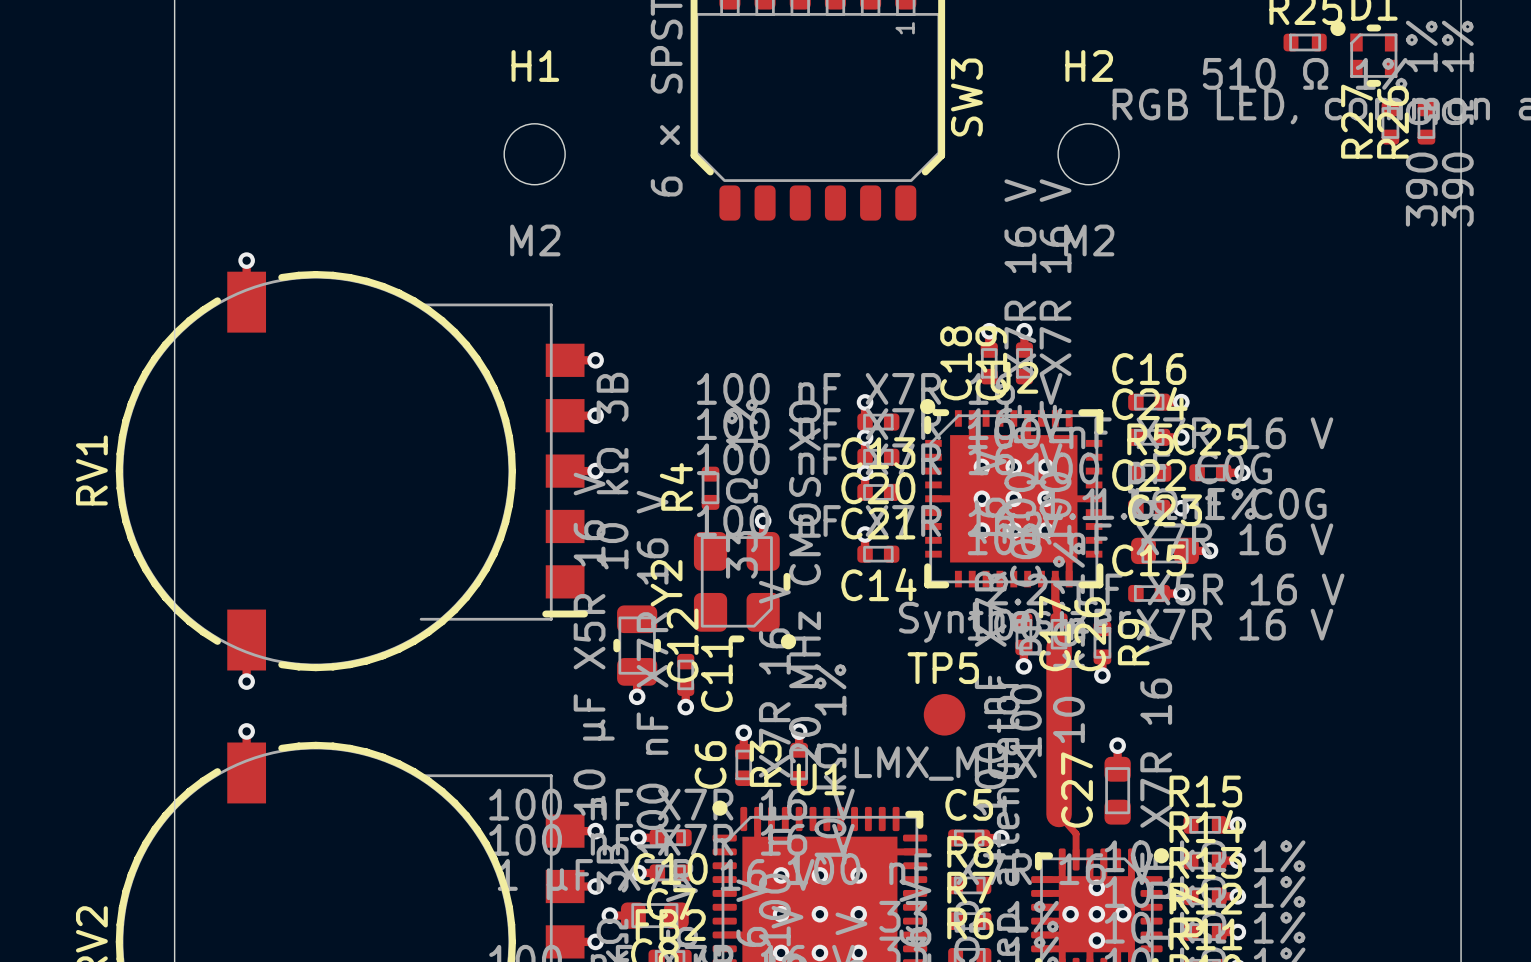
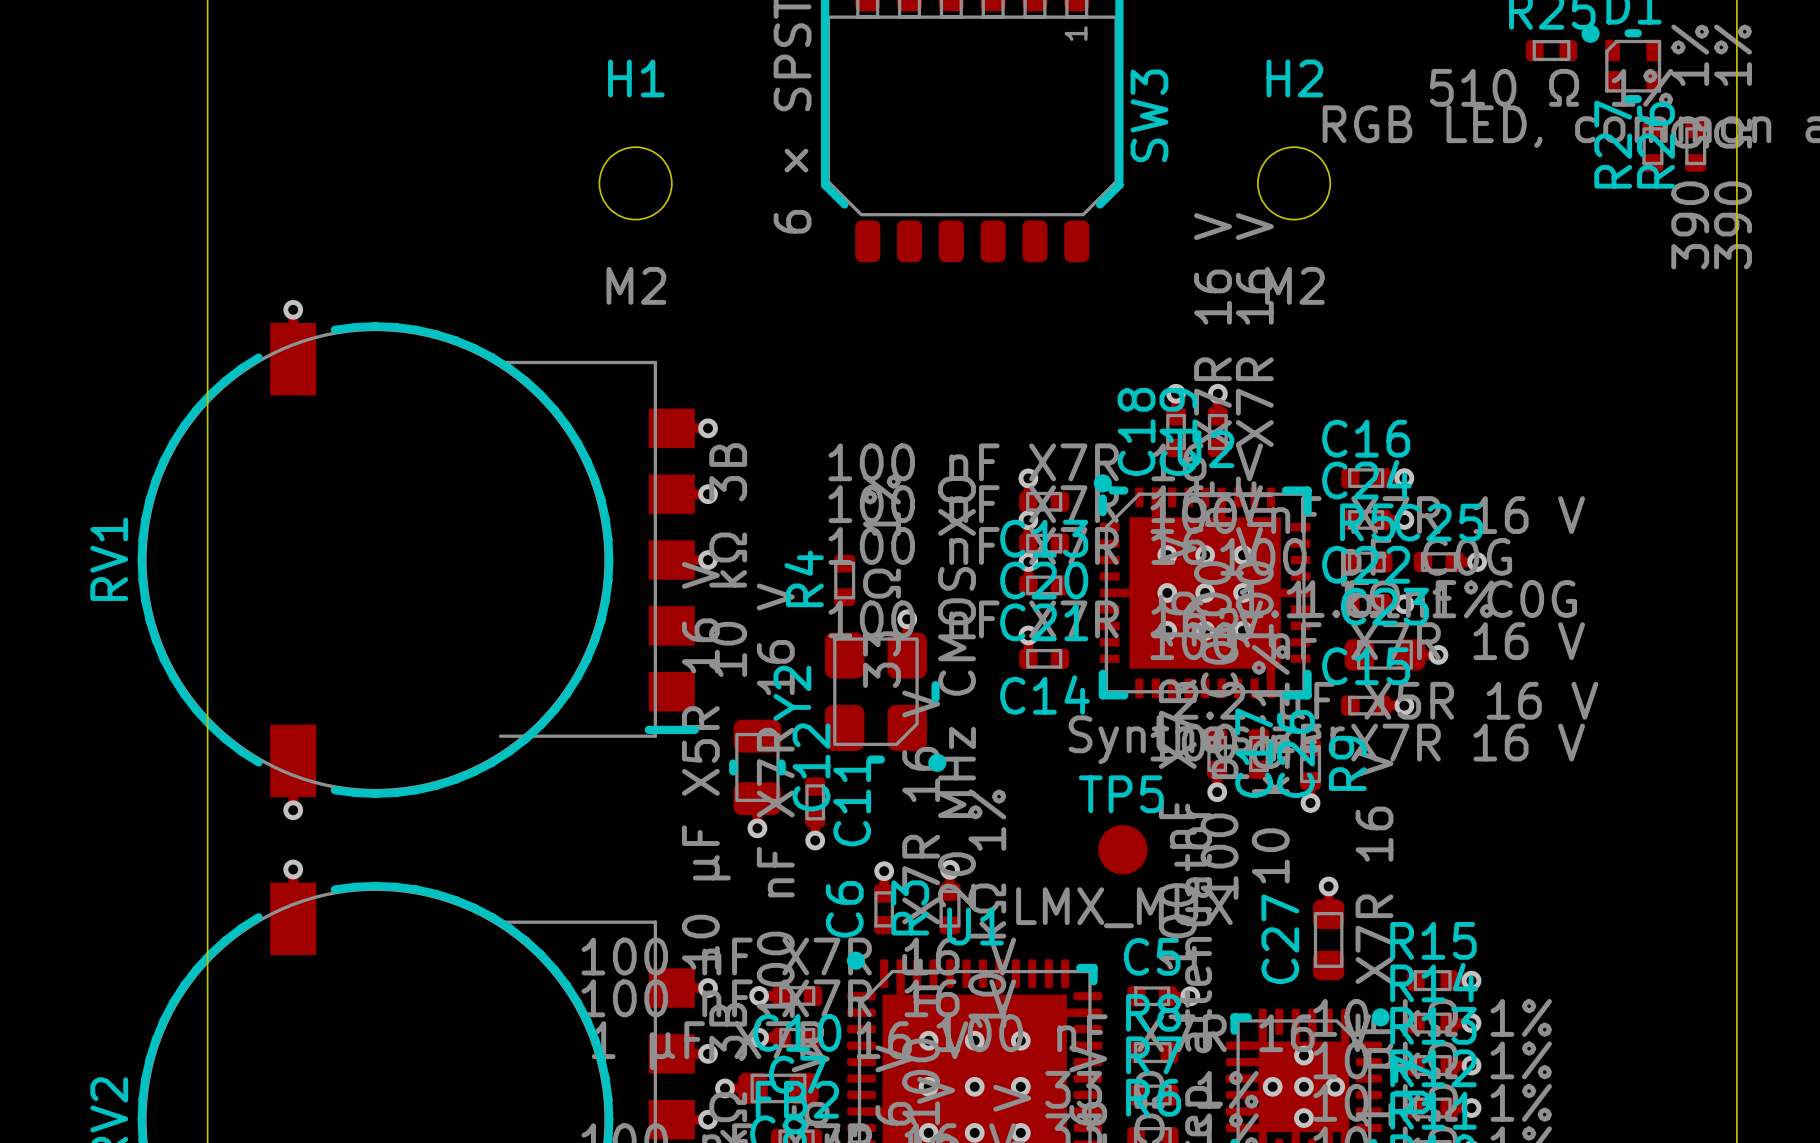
track: (1055, 579) (1055, 601) (1059, 620) -> none
track: (1059, 647) (1059, 814) (1076, 833) (1076, 859) -> none

